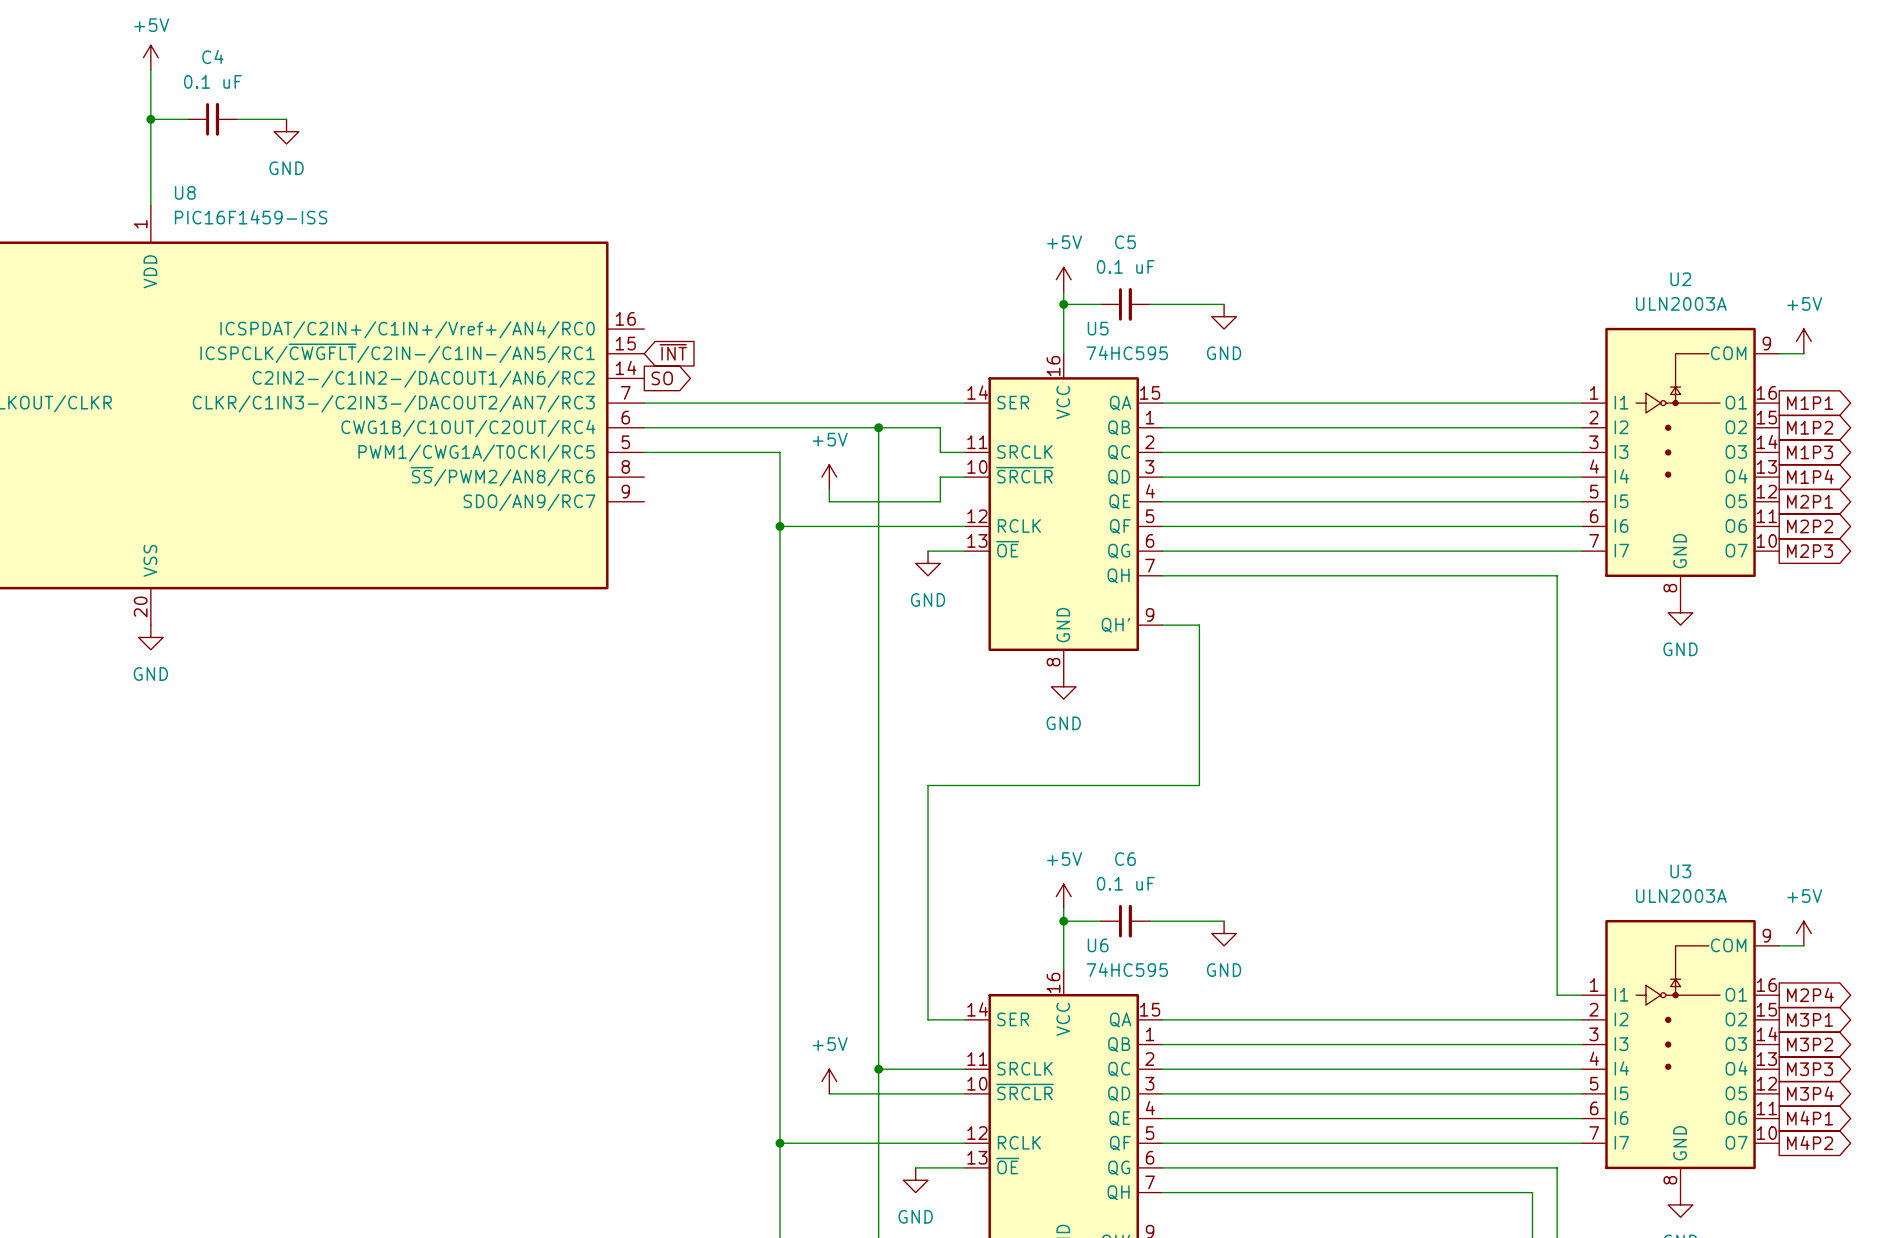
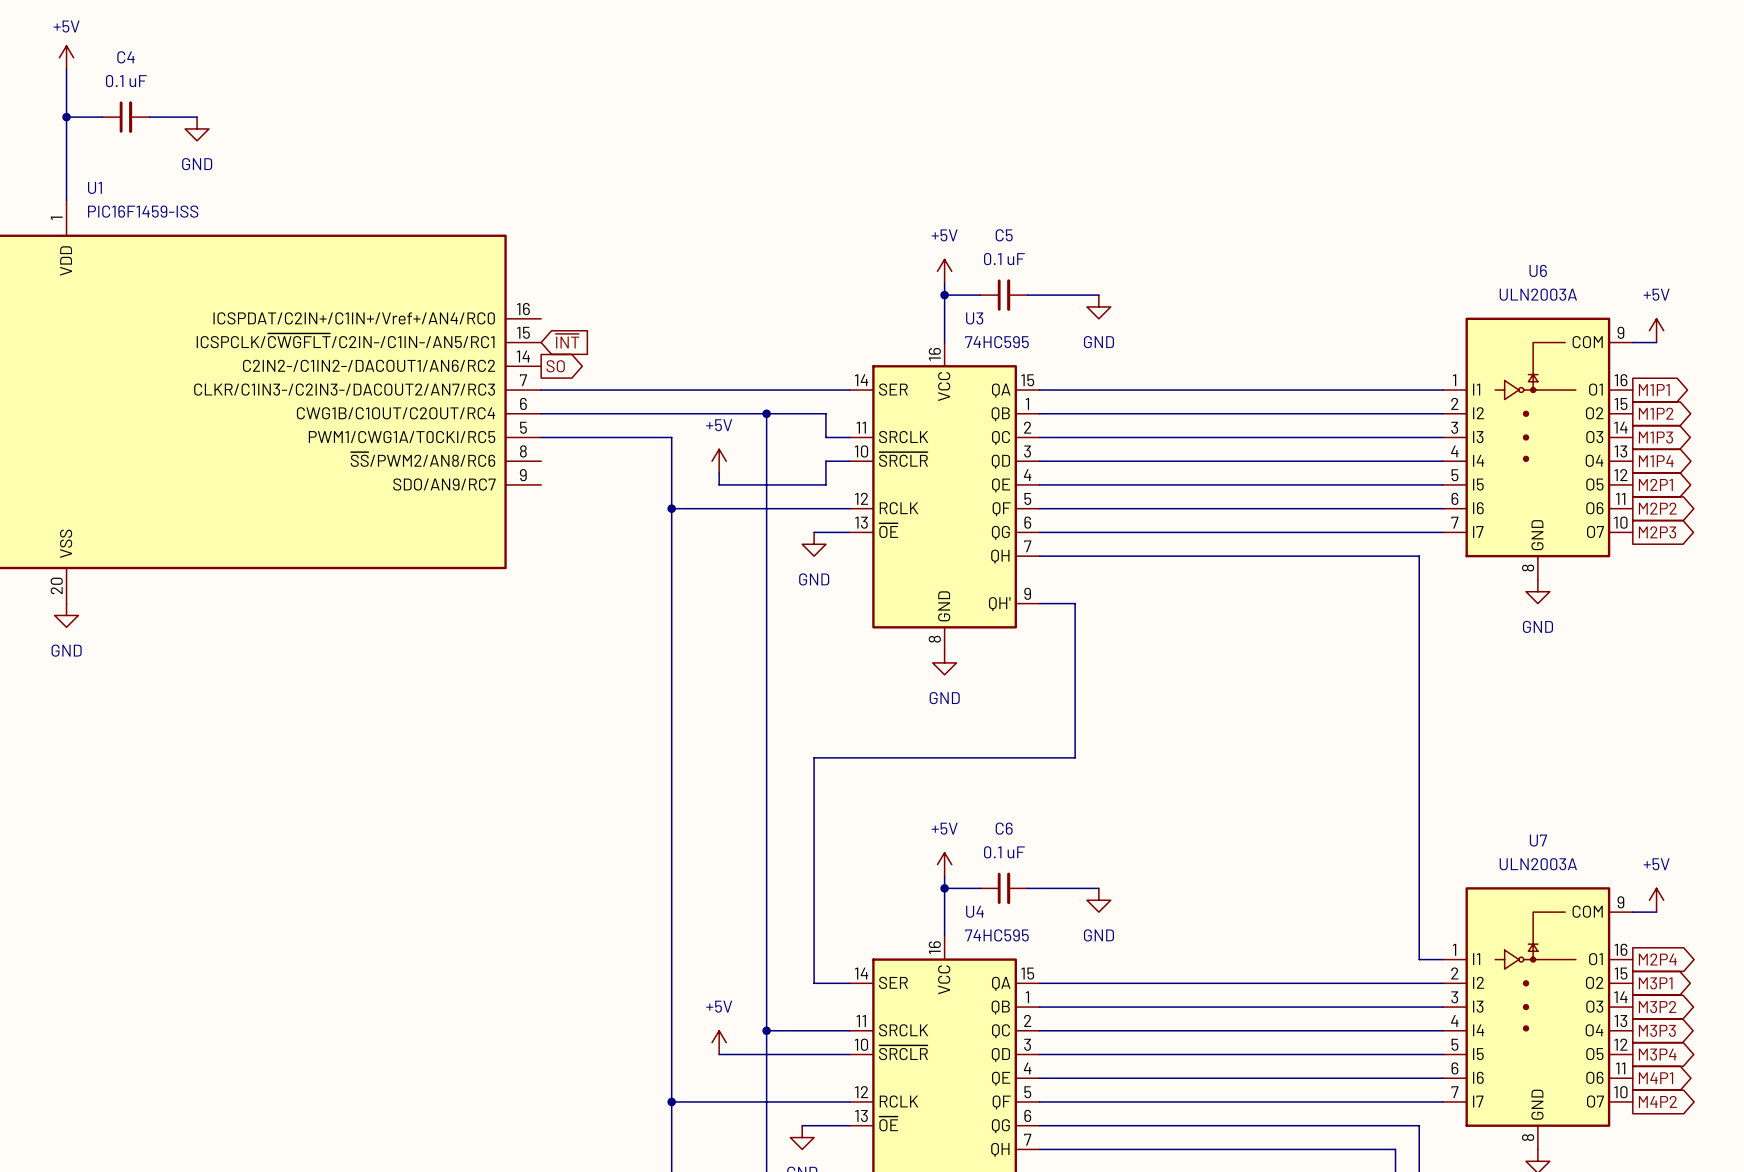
U8 name: U8 (185, 192) -> U1 (94, 187)
U2 name: U2 (1680, 279) -> U6 (1538, 270)
U5 name: U5 (1098, 328) -> U3 (974, 318)
U3 name: U3 (1680, 871) -> U7 (1538, 840)
U6 name: U6 (1098, 945) -> U4 (975, 911)

